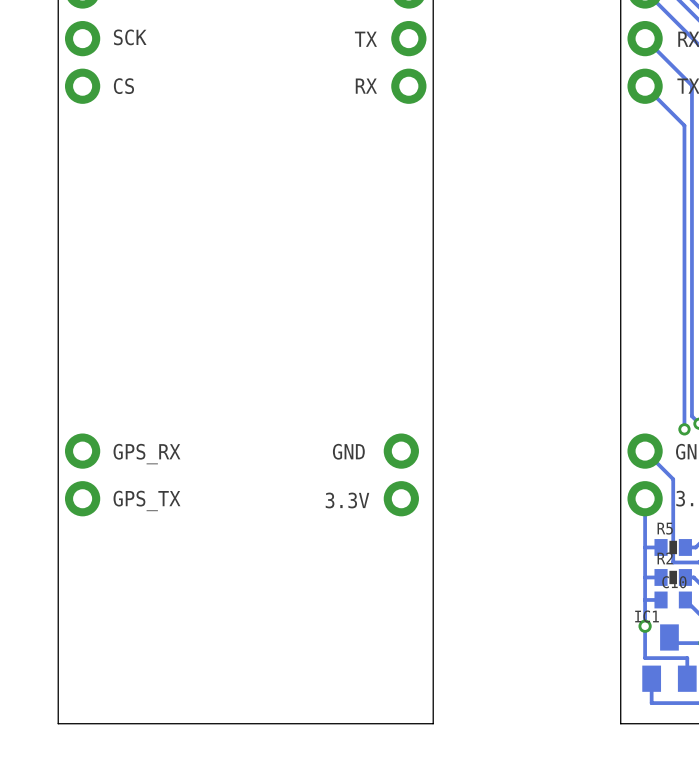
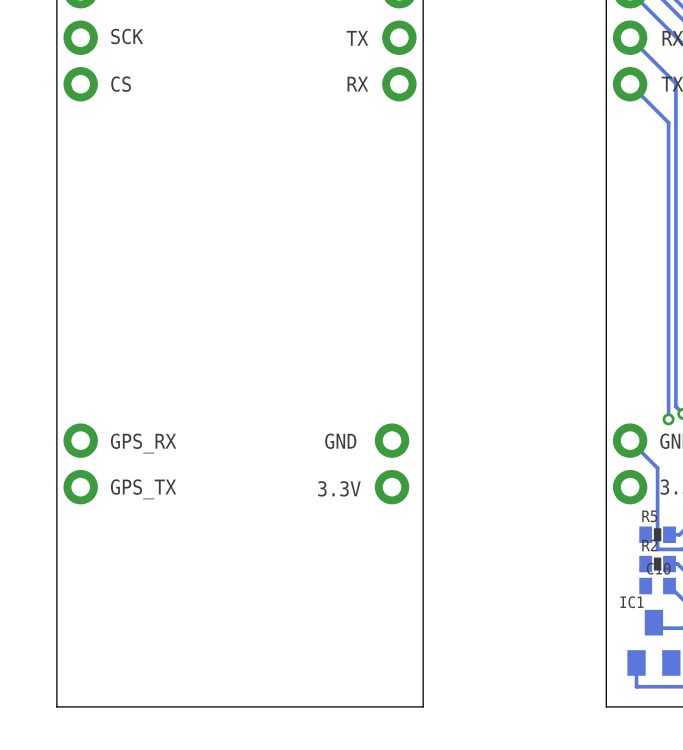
track: (645, 498) (645, 658) (687, 658) (687, 678) -> none
track: (661, 547) (645, 547) -> none
track: (661, 577) (645, 577) -> none
track: (661, 599) (645, 599) -> none
via: (645, 626) -> none

